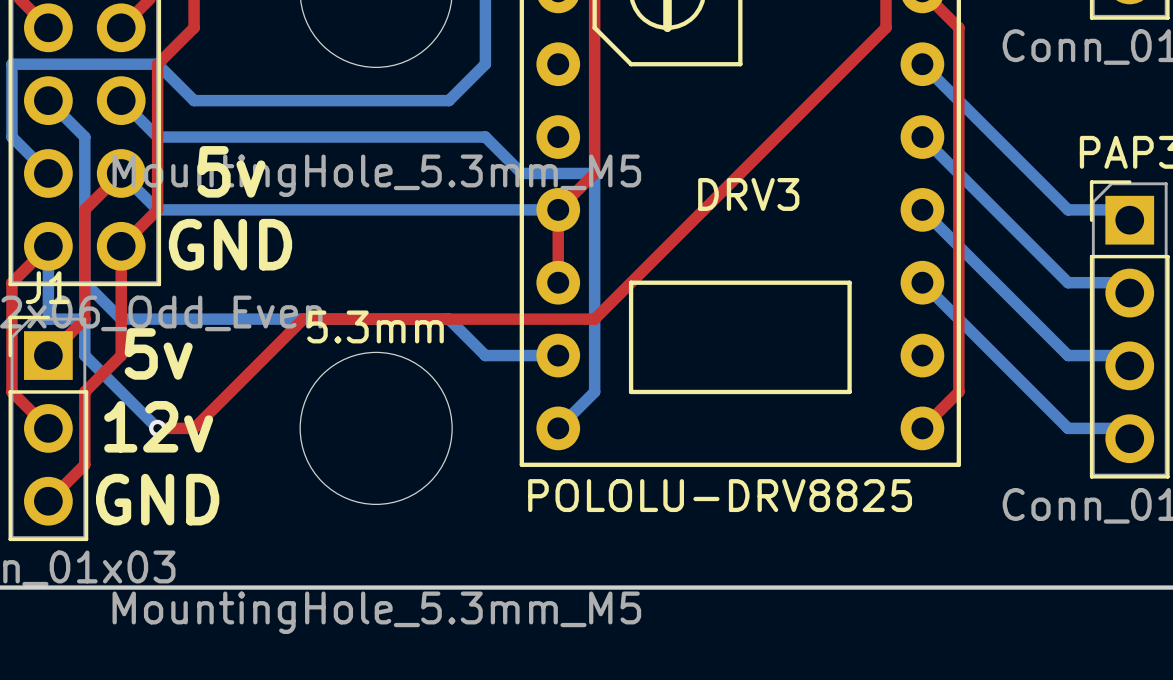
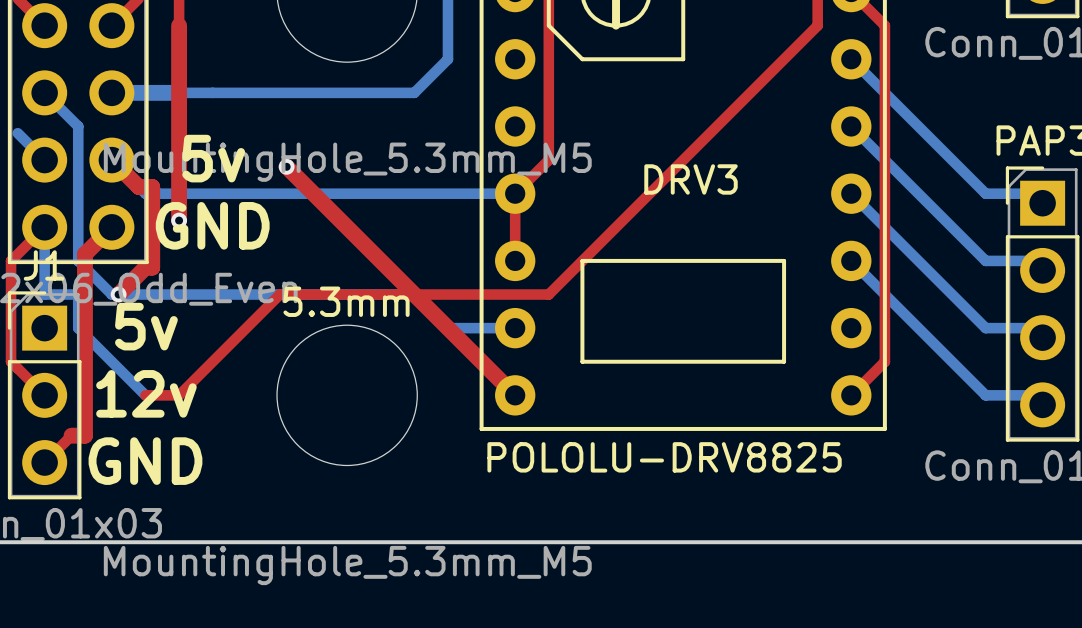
top track: (194, 27) (157, 64) (157, 209) (121, 246) (121, 355) (84, 391) (84, 464) (77, 472) -> (111, 227) (84, 254) (84, 435) (71, 435)
top track: none -> (179, 25) (179, 220)
bottom track: (121, 100) (157, 137) (485, 137) (521, 173) (594, 173) (594, 391) (558, 428) -> none
bottom track: (194, 100) (157, 64) (11, 64) (11, 137) (19, 144) -> (179, 92) (111, 92)
top track: (121, 173) (84, 209) (84, 319) (48, 355) -> (111, 160) (138, 186) (152, 186) (152, 267) (145, 267) (118, 294)
top track: none -> (286, 166) (515, 395)
via: none -> (286, 166)
via: none -> (179, 220)
via: none -> (118, 294)
via: (157, 428) -> none

